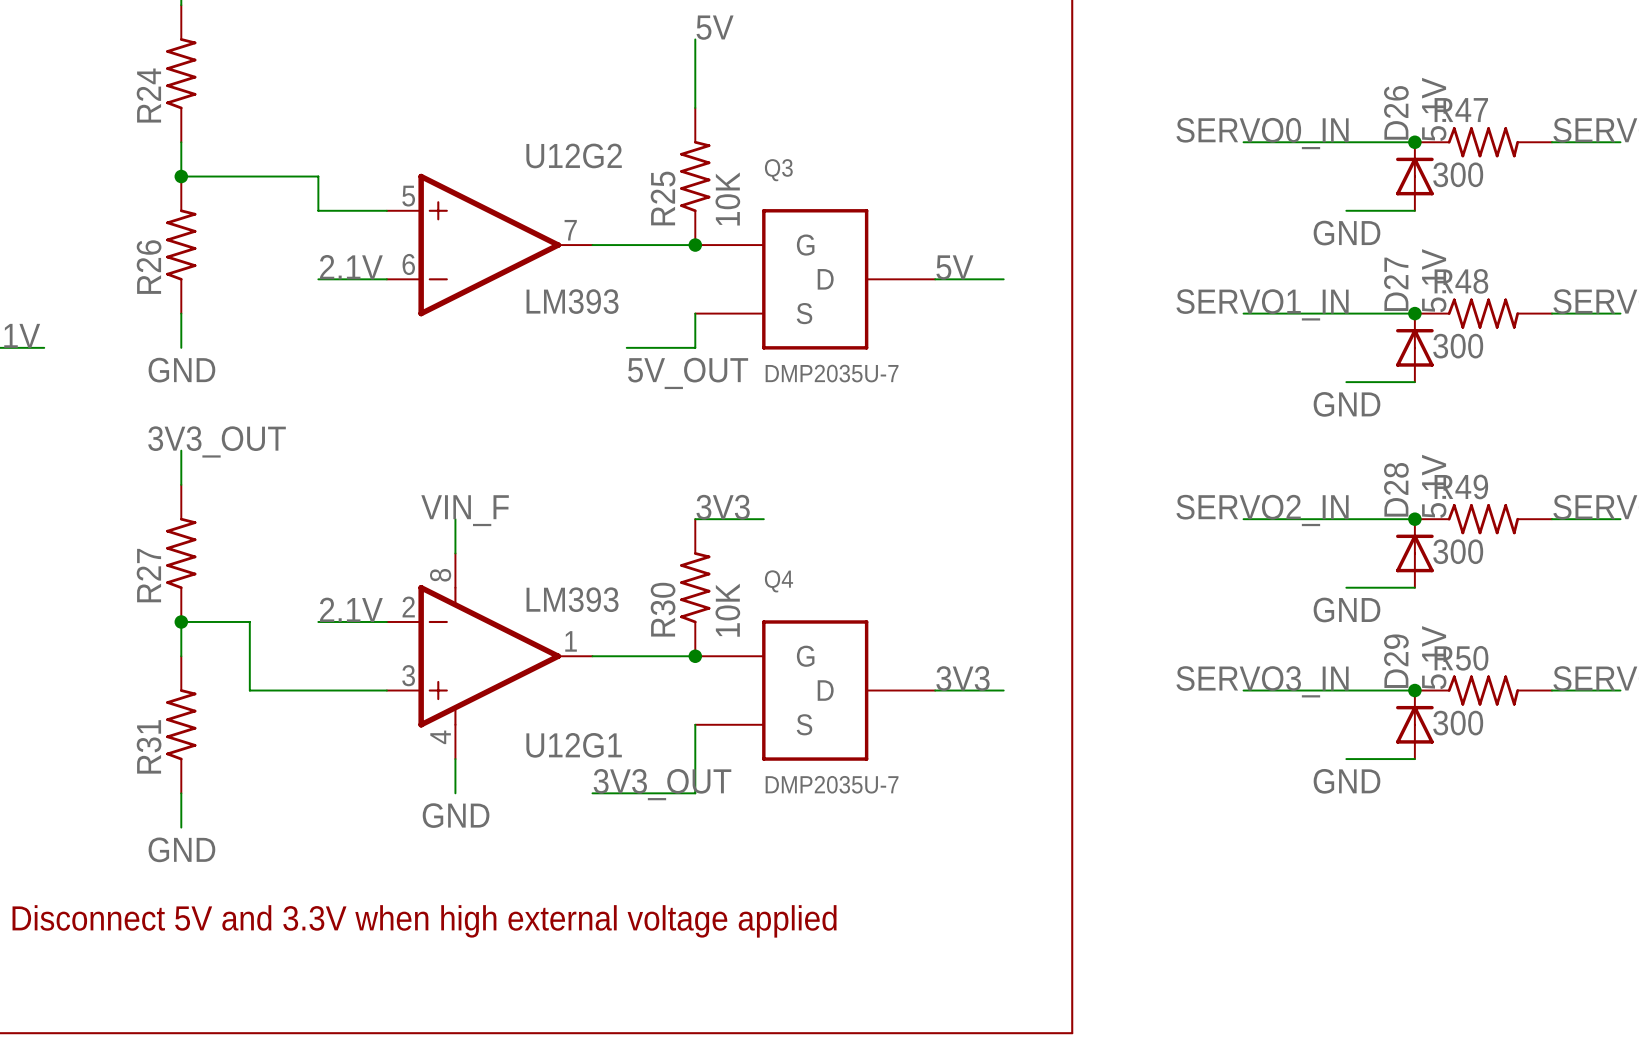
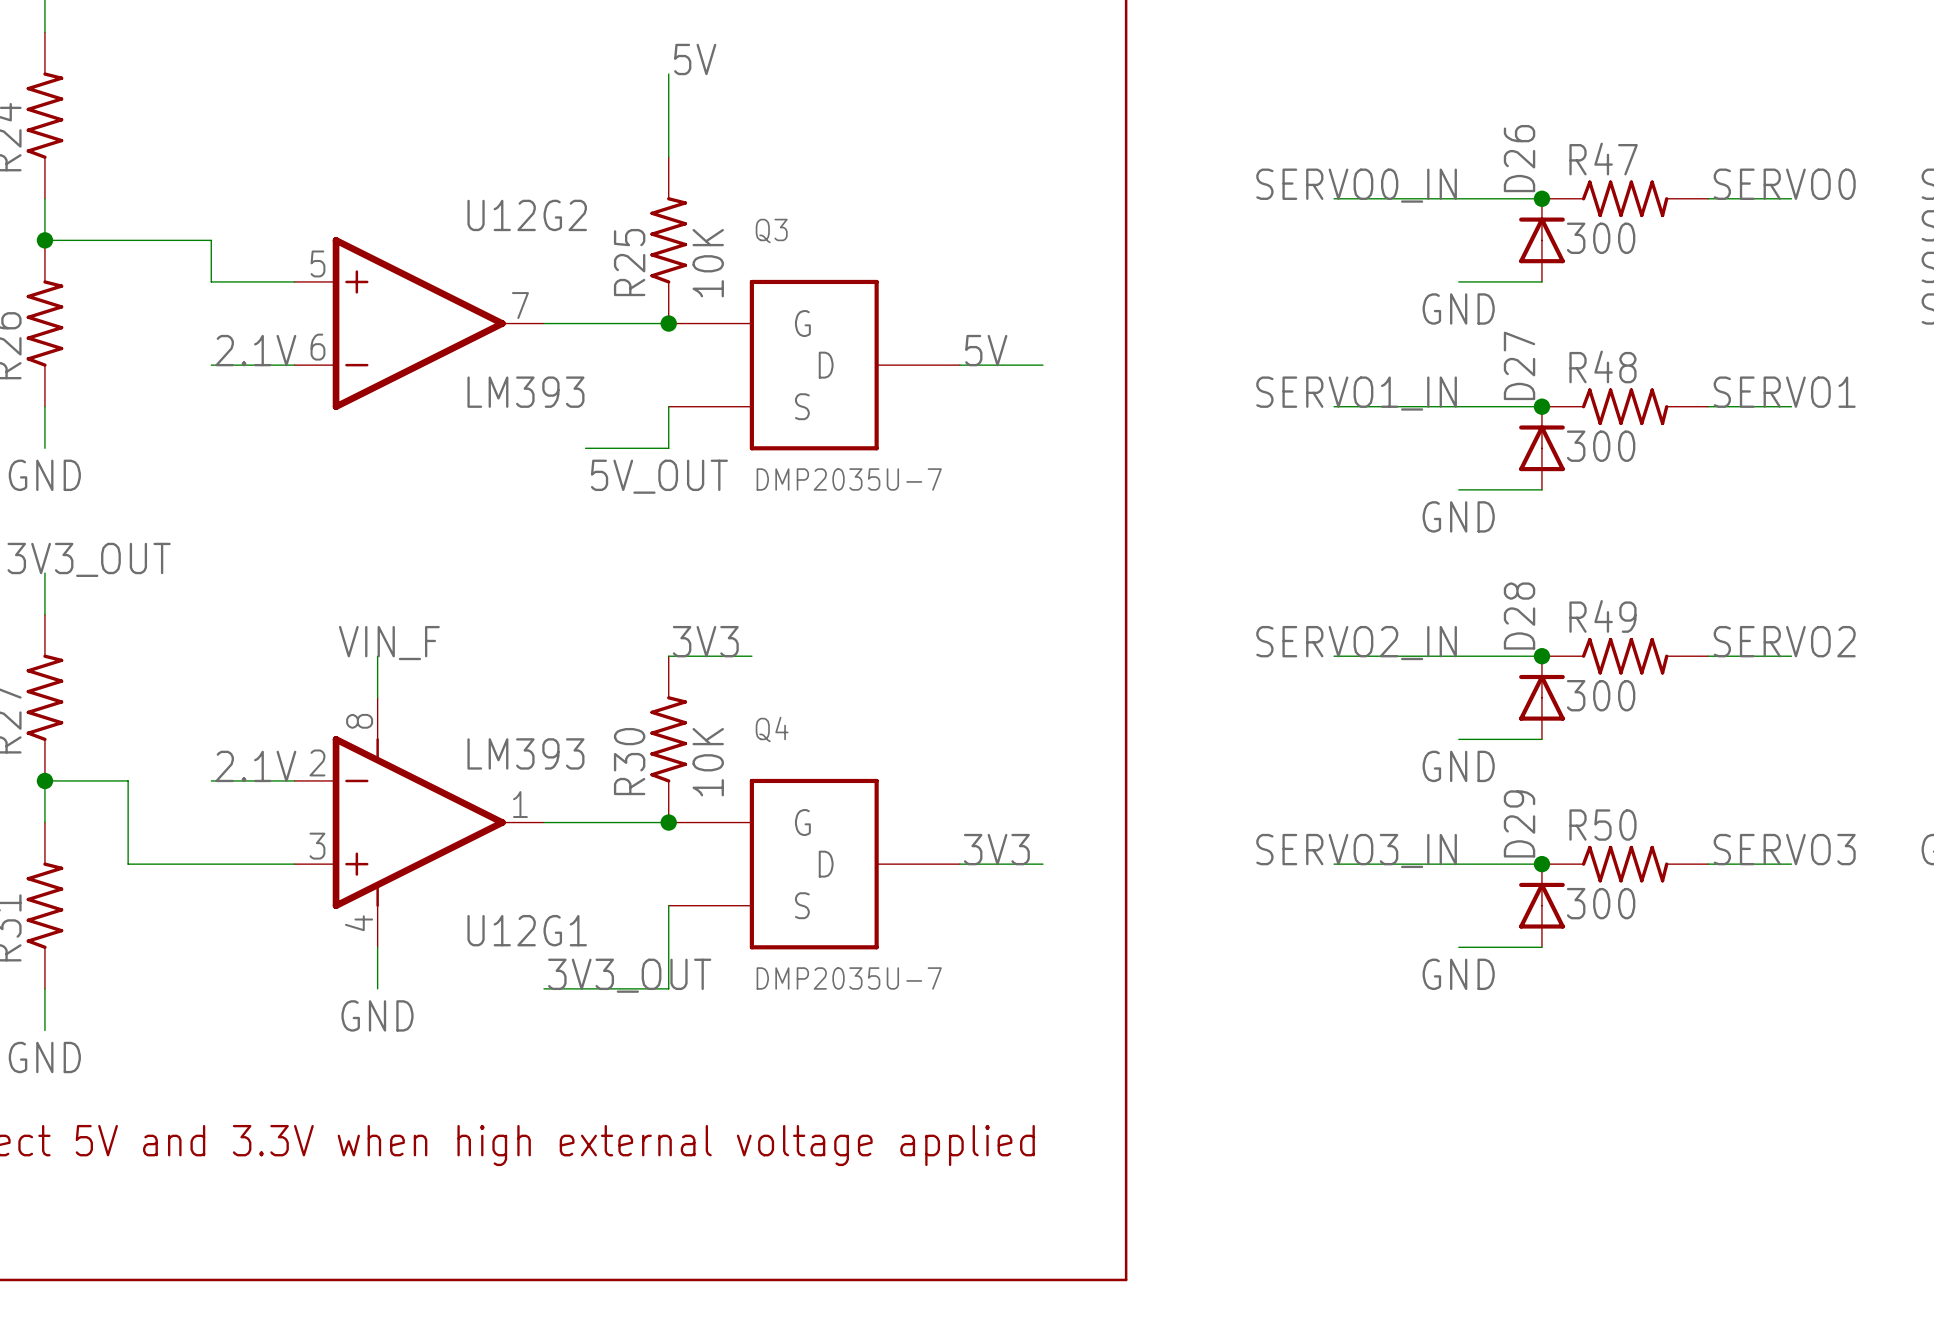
D26 value: 5.1V (1434, 109) -> none
D27 value: 5.1V (1434, 280) -> none
D28 value: 5.1V (1434, 486) -> none
D29 value: 5.1V (1434, 657) -> none

